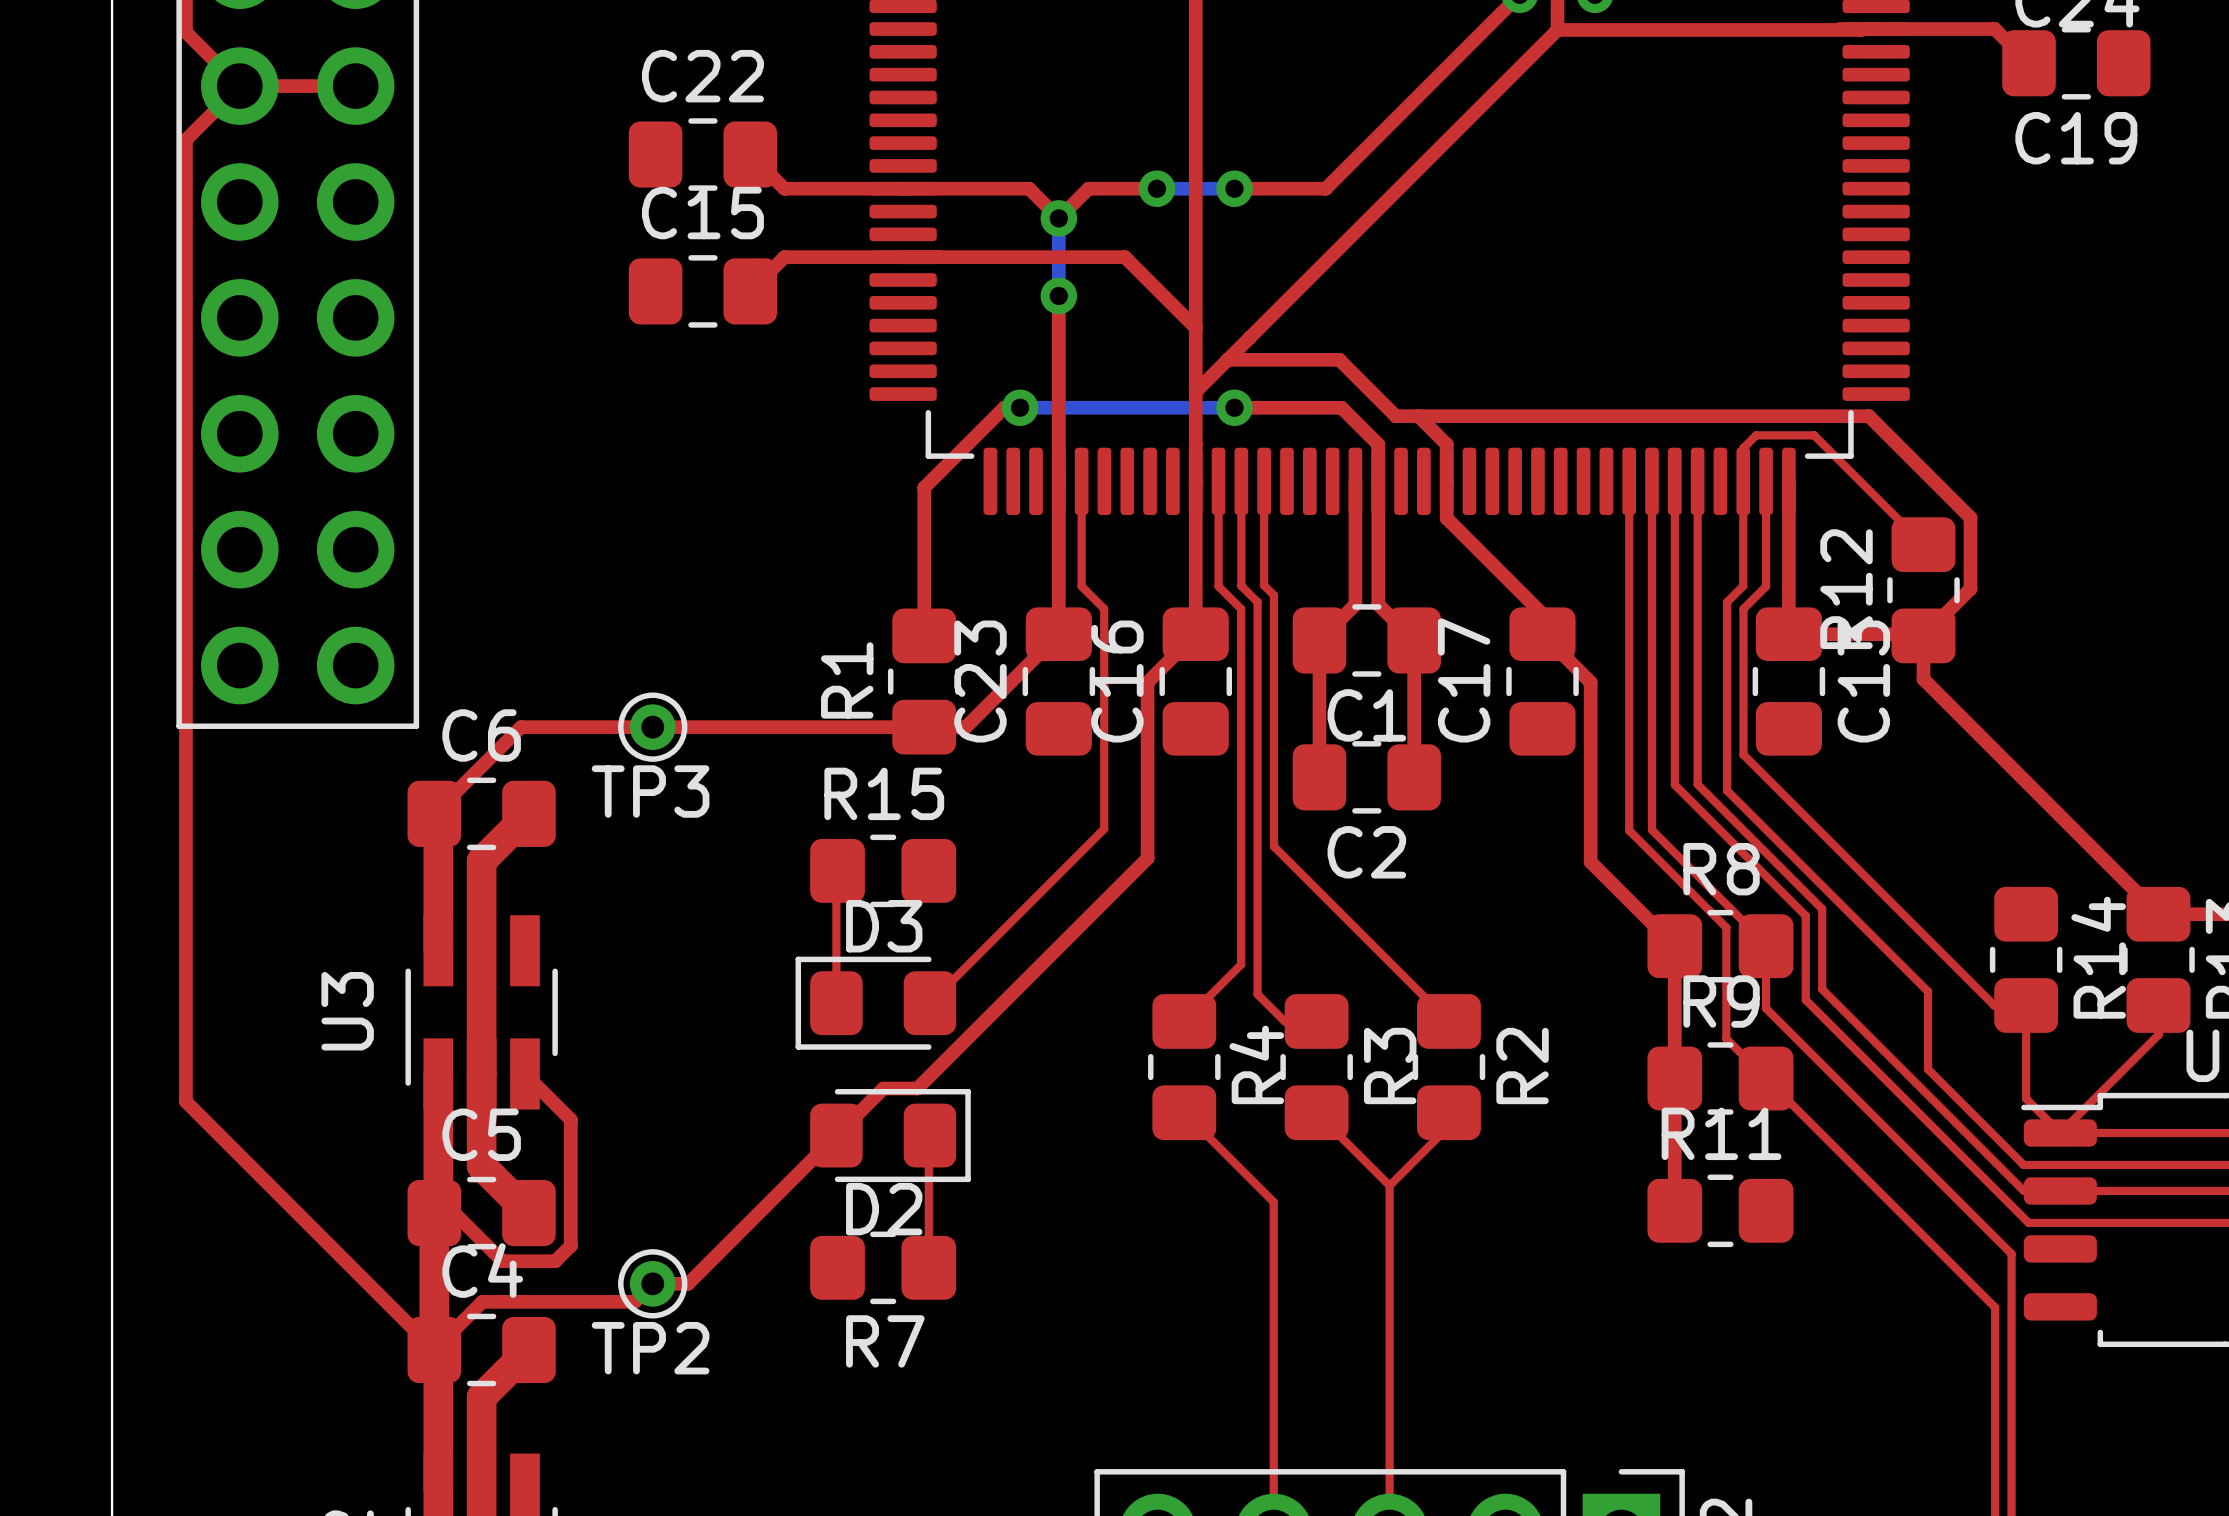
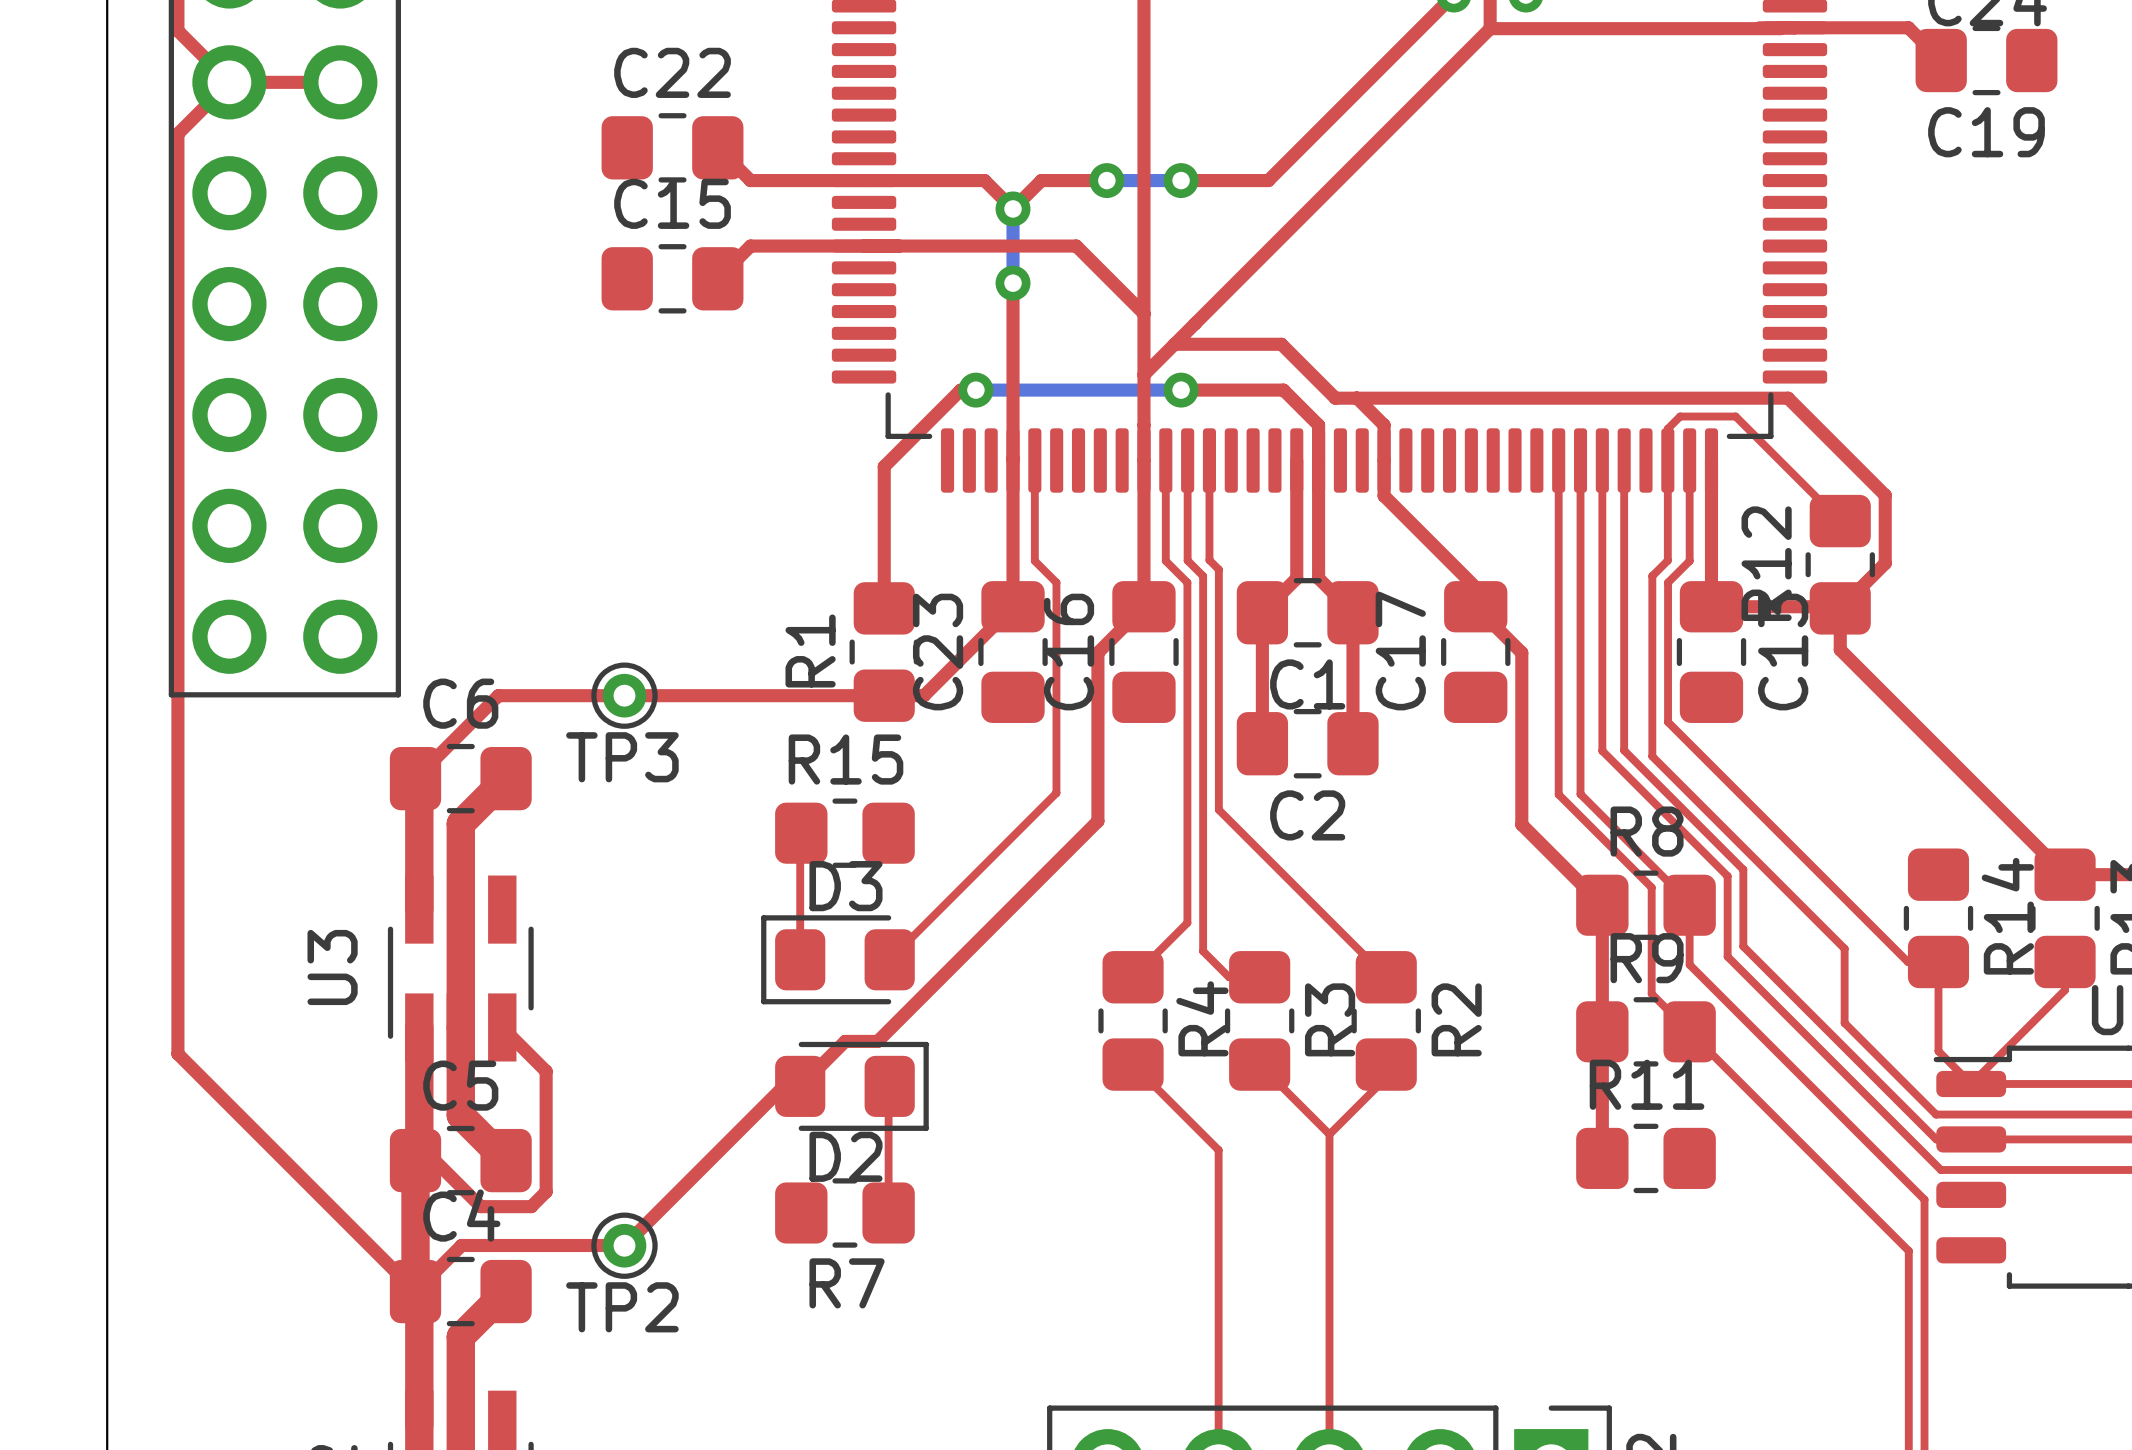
top track: (836, 1135) (688, 1283) (652, 1283) (634, 1301) -> (800, 1086) (783, 1086) (624, 1245)
TP2 position: (652, 1283) -> (624, 1245)

